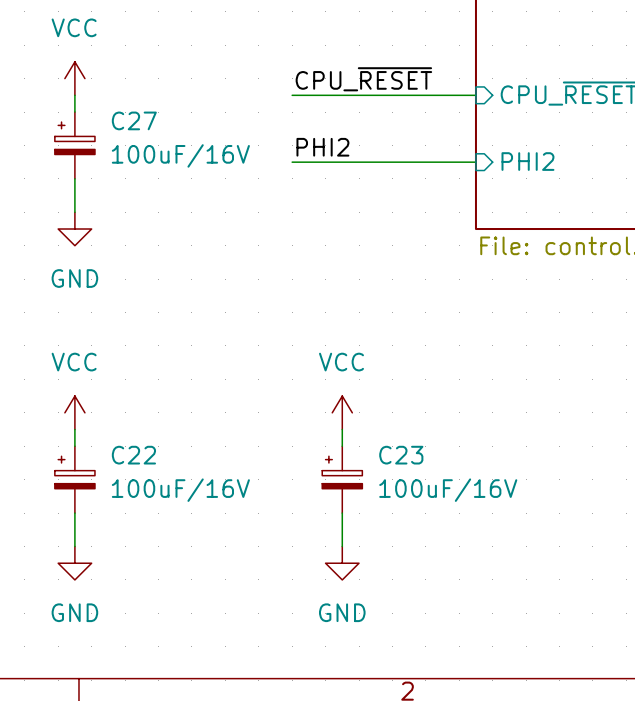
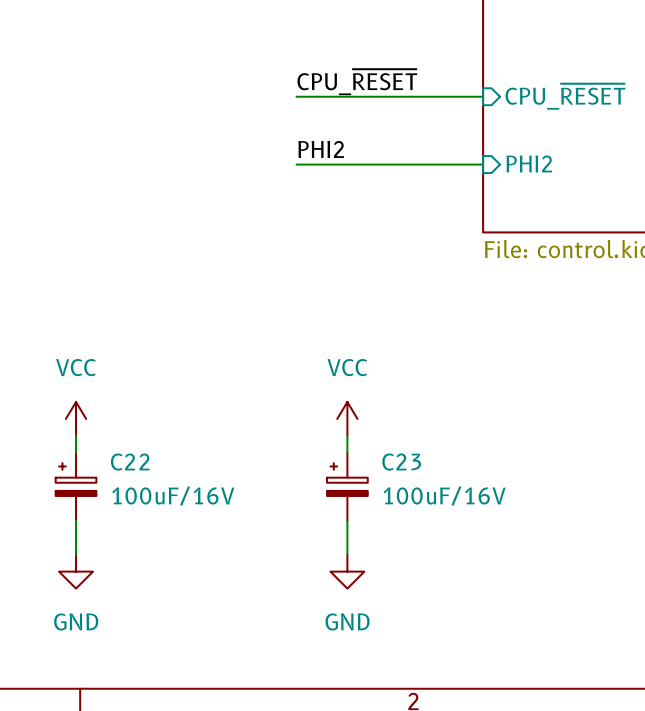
power symbol: VCC (74, 78) -> none
wire: (74, 95) (74, 112) -> none
C27: 100uF/16V (74, 145) -> none
wire: (74, 178) (74, 212) -> none
power symbol: GND (74, 229) -> none

